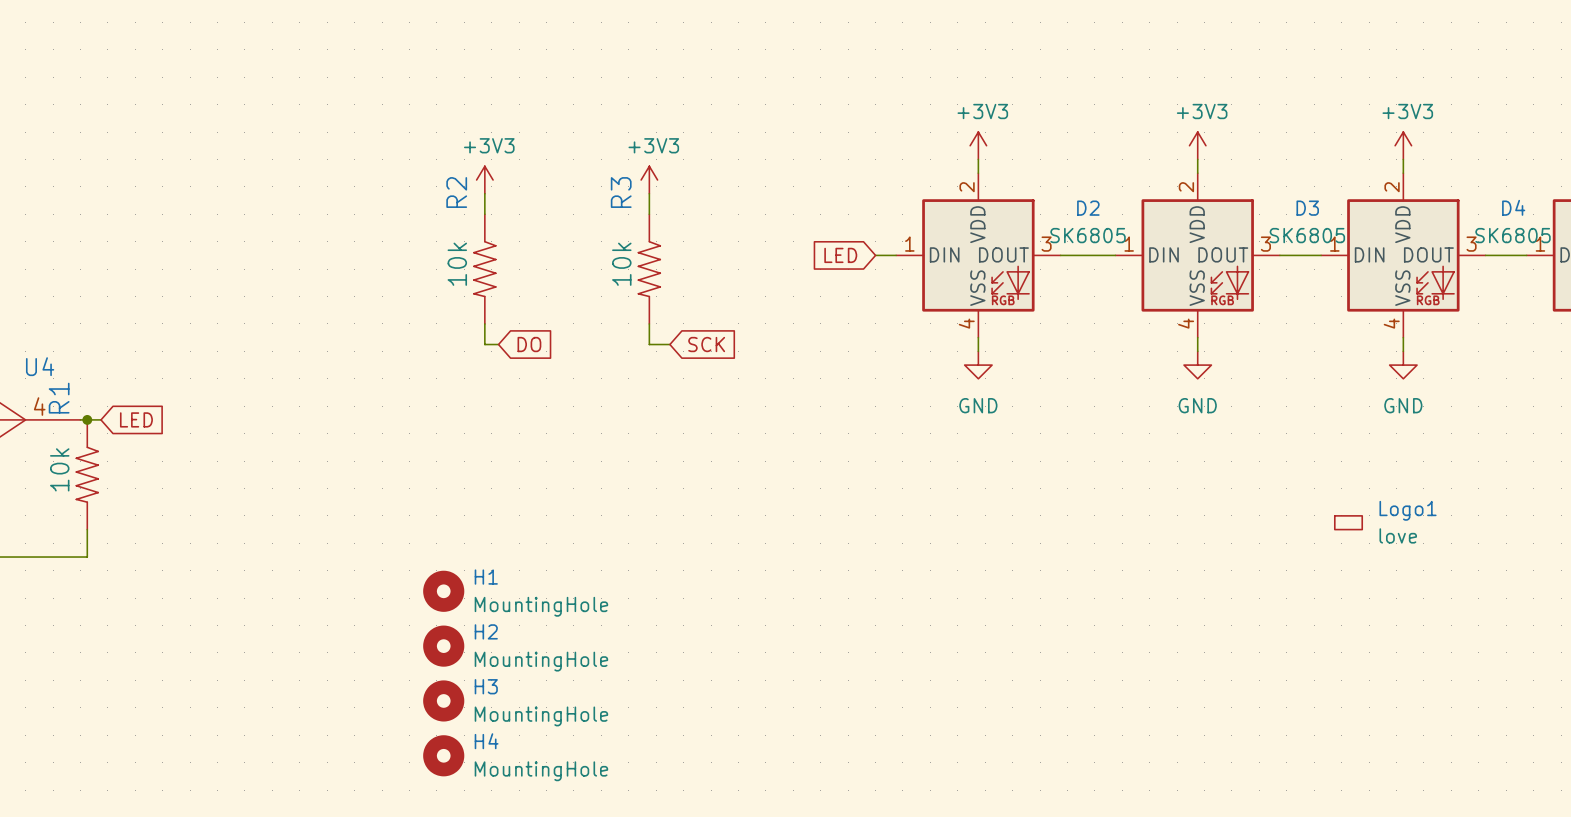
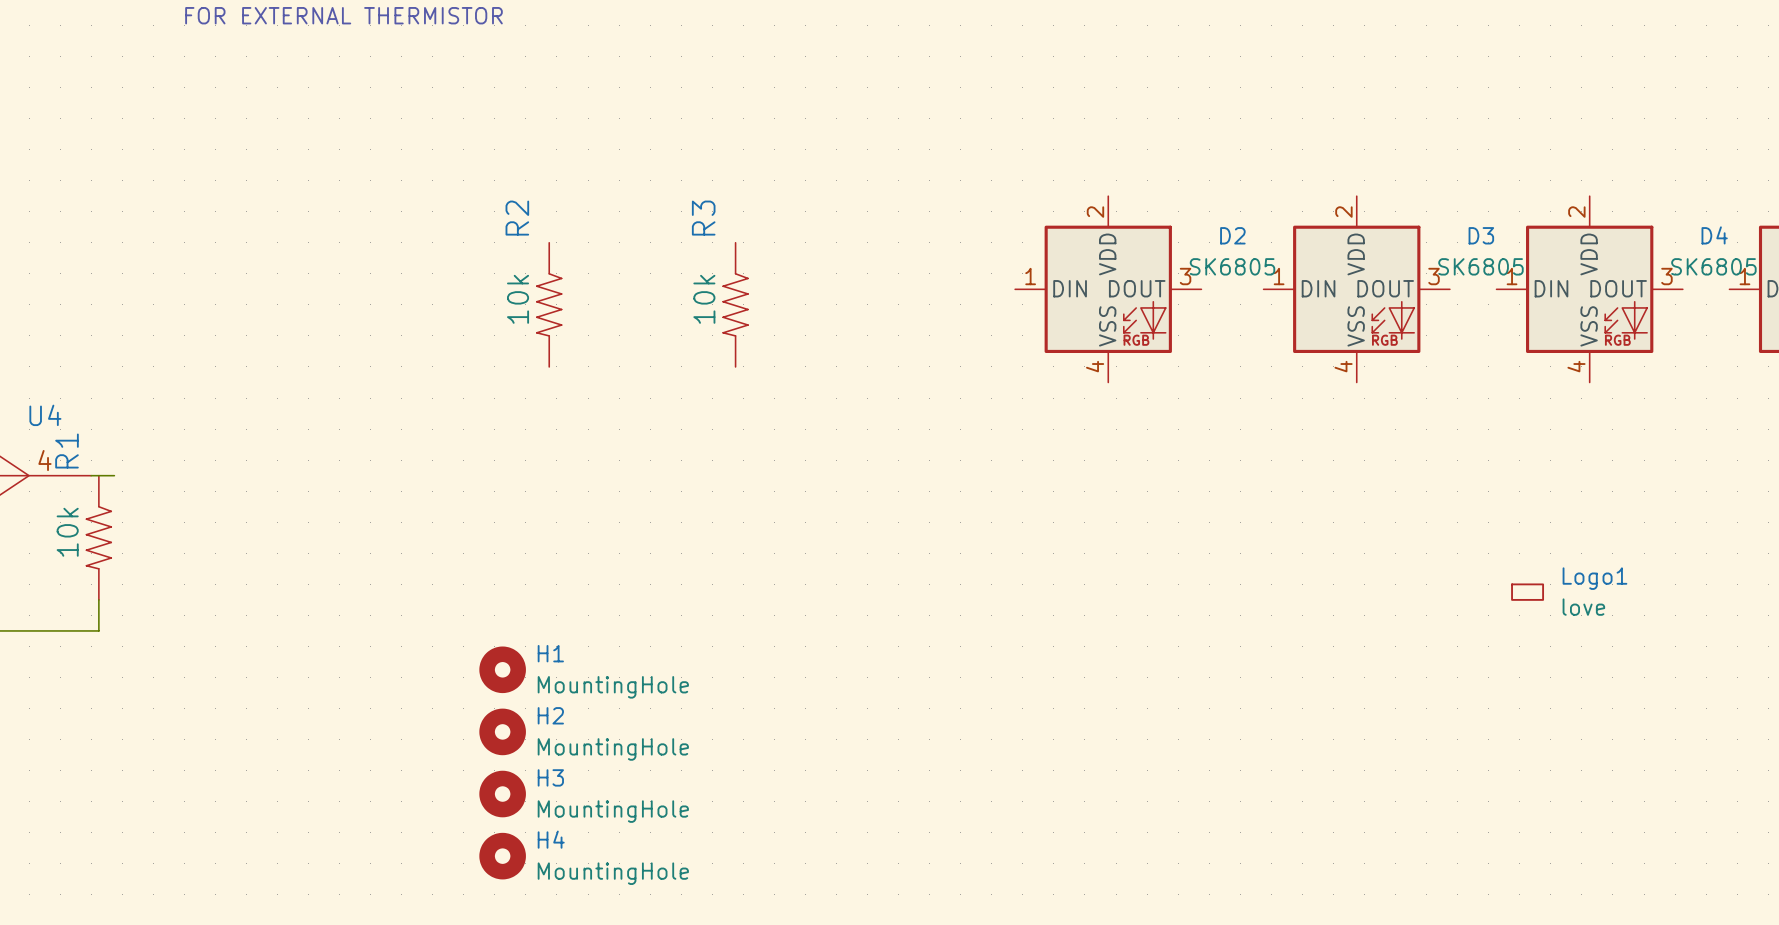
text: none -> FOR EXTERNAL THERMISTOR (343, 15)
power symbol: +3V3 (978, 145) -> none
power symbol: +3V3 (1197, 145) -> none
power symbol: +3V3 (1403, 145) -> none
wire: (978, 159) (978, 173) -> none
wire: (1197, 159) (1197, 173) -> none
wire: (1403, 159) (1403, 173) -> none
power symbol: +3V3 (484, 180) -> none
power symbol: +3V3 (649, 180) -> none
wire: (484, 193) (484, 214) -> none
wire: (649, 193) (649, 214) -> none
global label: LED (840, 255) -> none
wire: (875, 255) (896, 255) -> none
wire: (1060, 255) (1115, 255) -> none
wire: (1279, 255) (1321, 255) -> none
wire: (1485, 255) (1526, 255) -> none
wire: (484, 323) (484, 344) (498, 344) -> none
wire: (649, 323) (649, 344) (669, 344) -> none
wire: (978, 337) (978, 351) -> none
wire: (1197, 337) (1197, 351) -> none
wire: (1403, 337) (1403, 351) -> none
global label: DO (529, 344) -> none
global label: SCK (706, 344) -> none
power symbol: GND (978, 365) -> none
power symbol: GND (1197, 365) -> none
power symbol: GND (1403, 365) -> none
junction: (87, 419) -> none
global label: LED (136, 419) -> none

